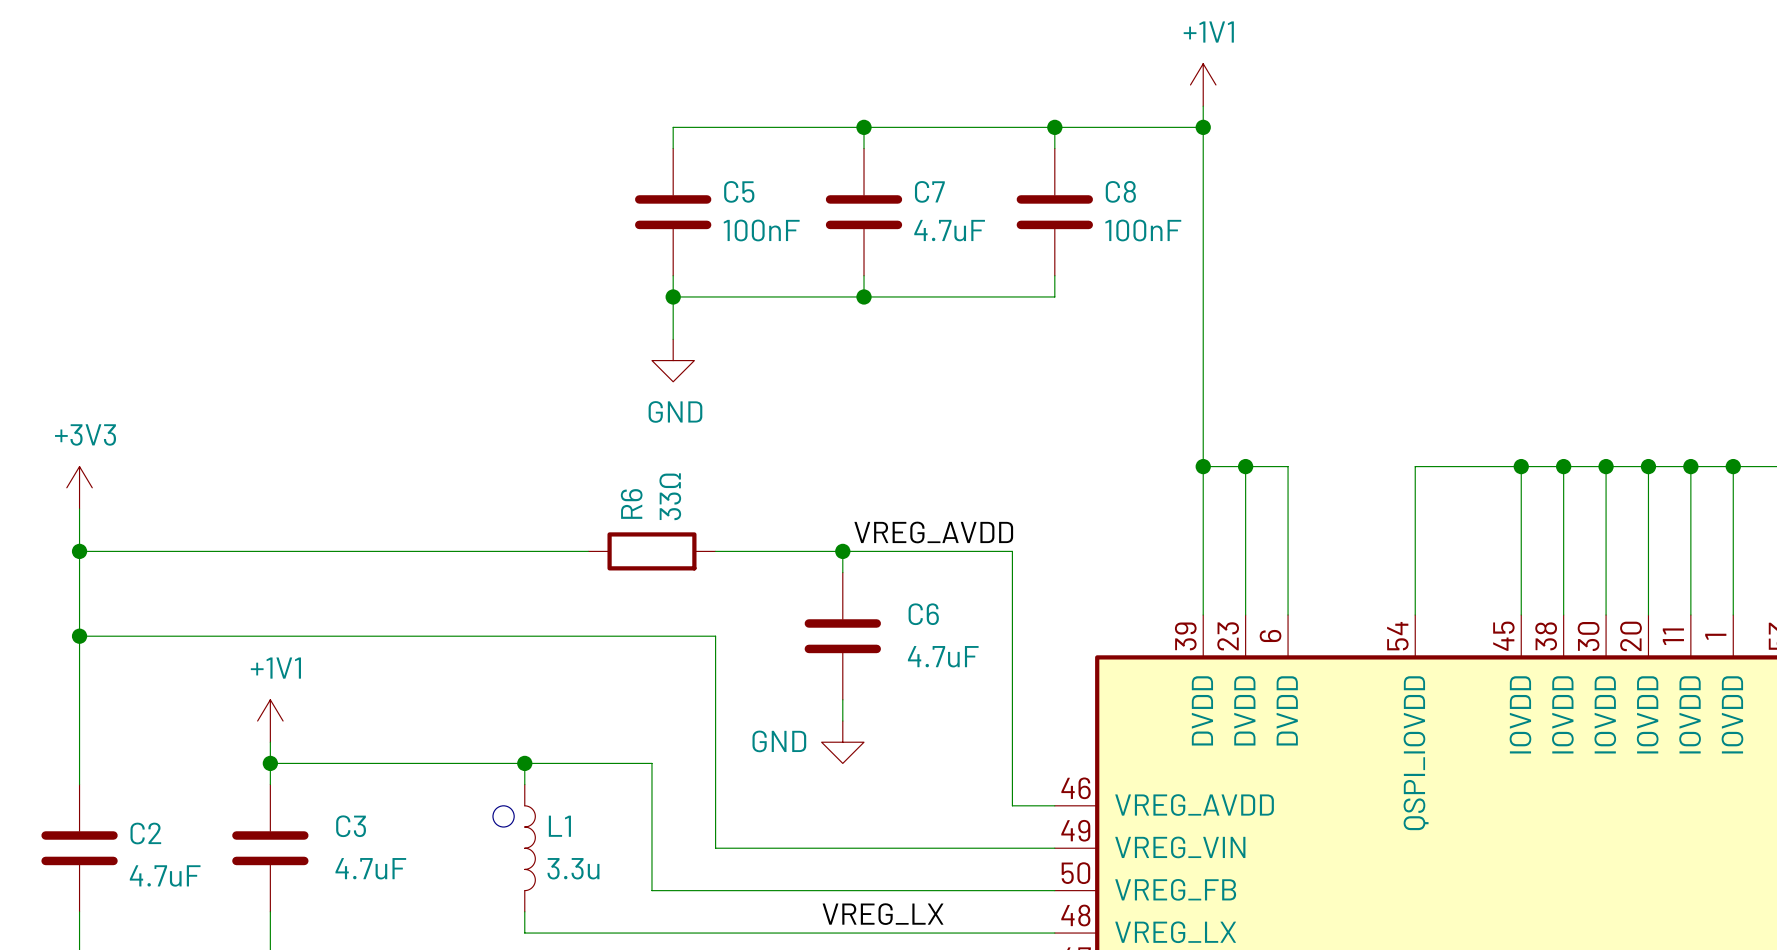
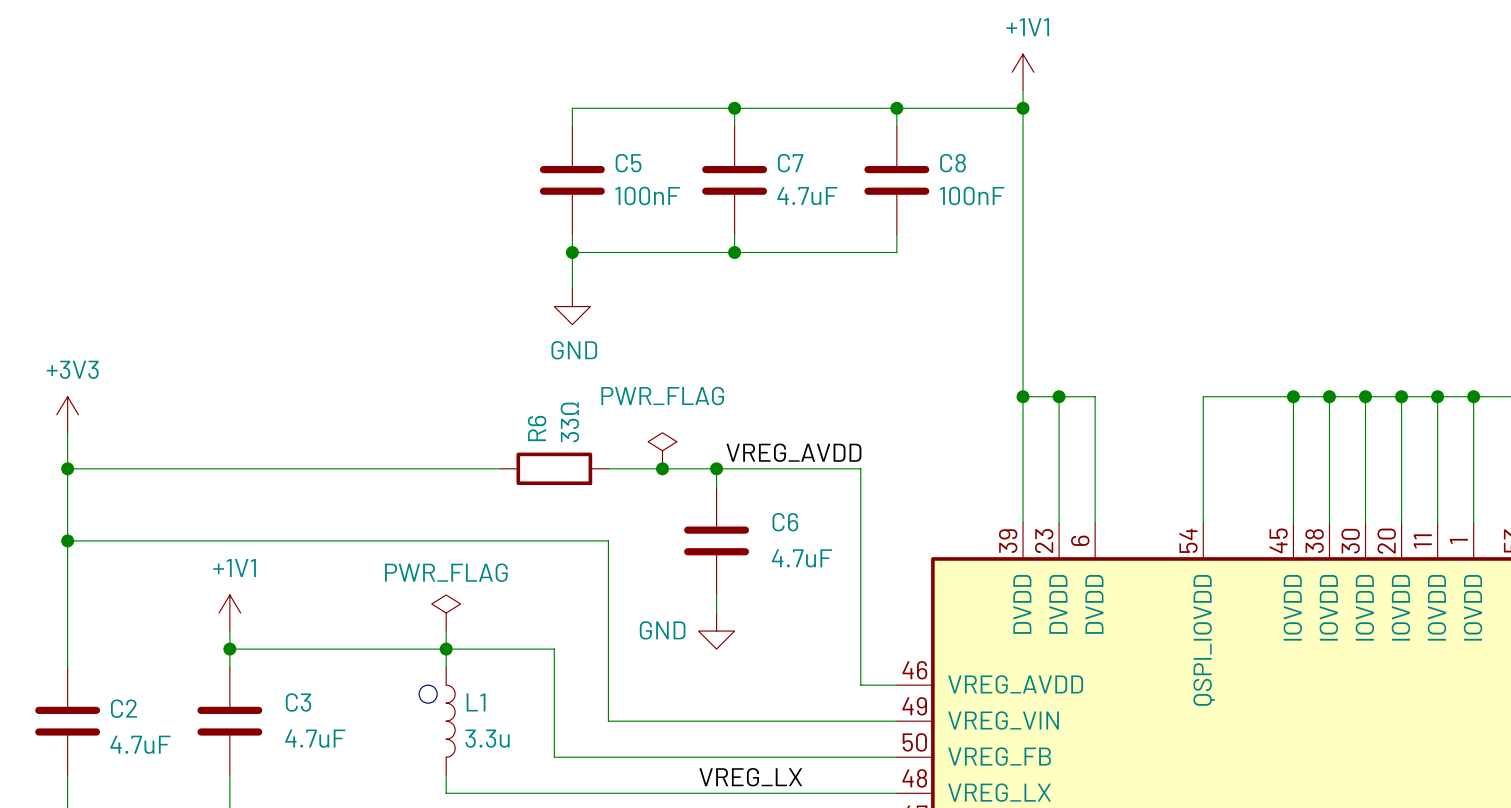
power symbol: none -> PWR_FLAG (662, 450)
junction: none -> (662, 468)
power symbol: none -> PWR_FLAG (446, 613)
wire: none -> (446, 631) (446, 649)

